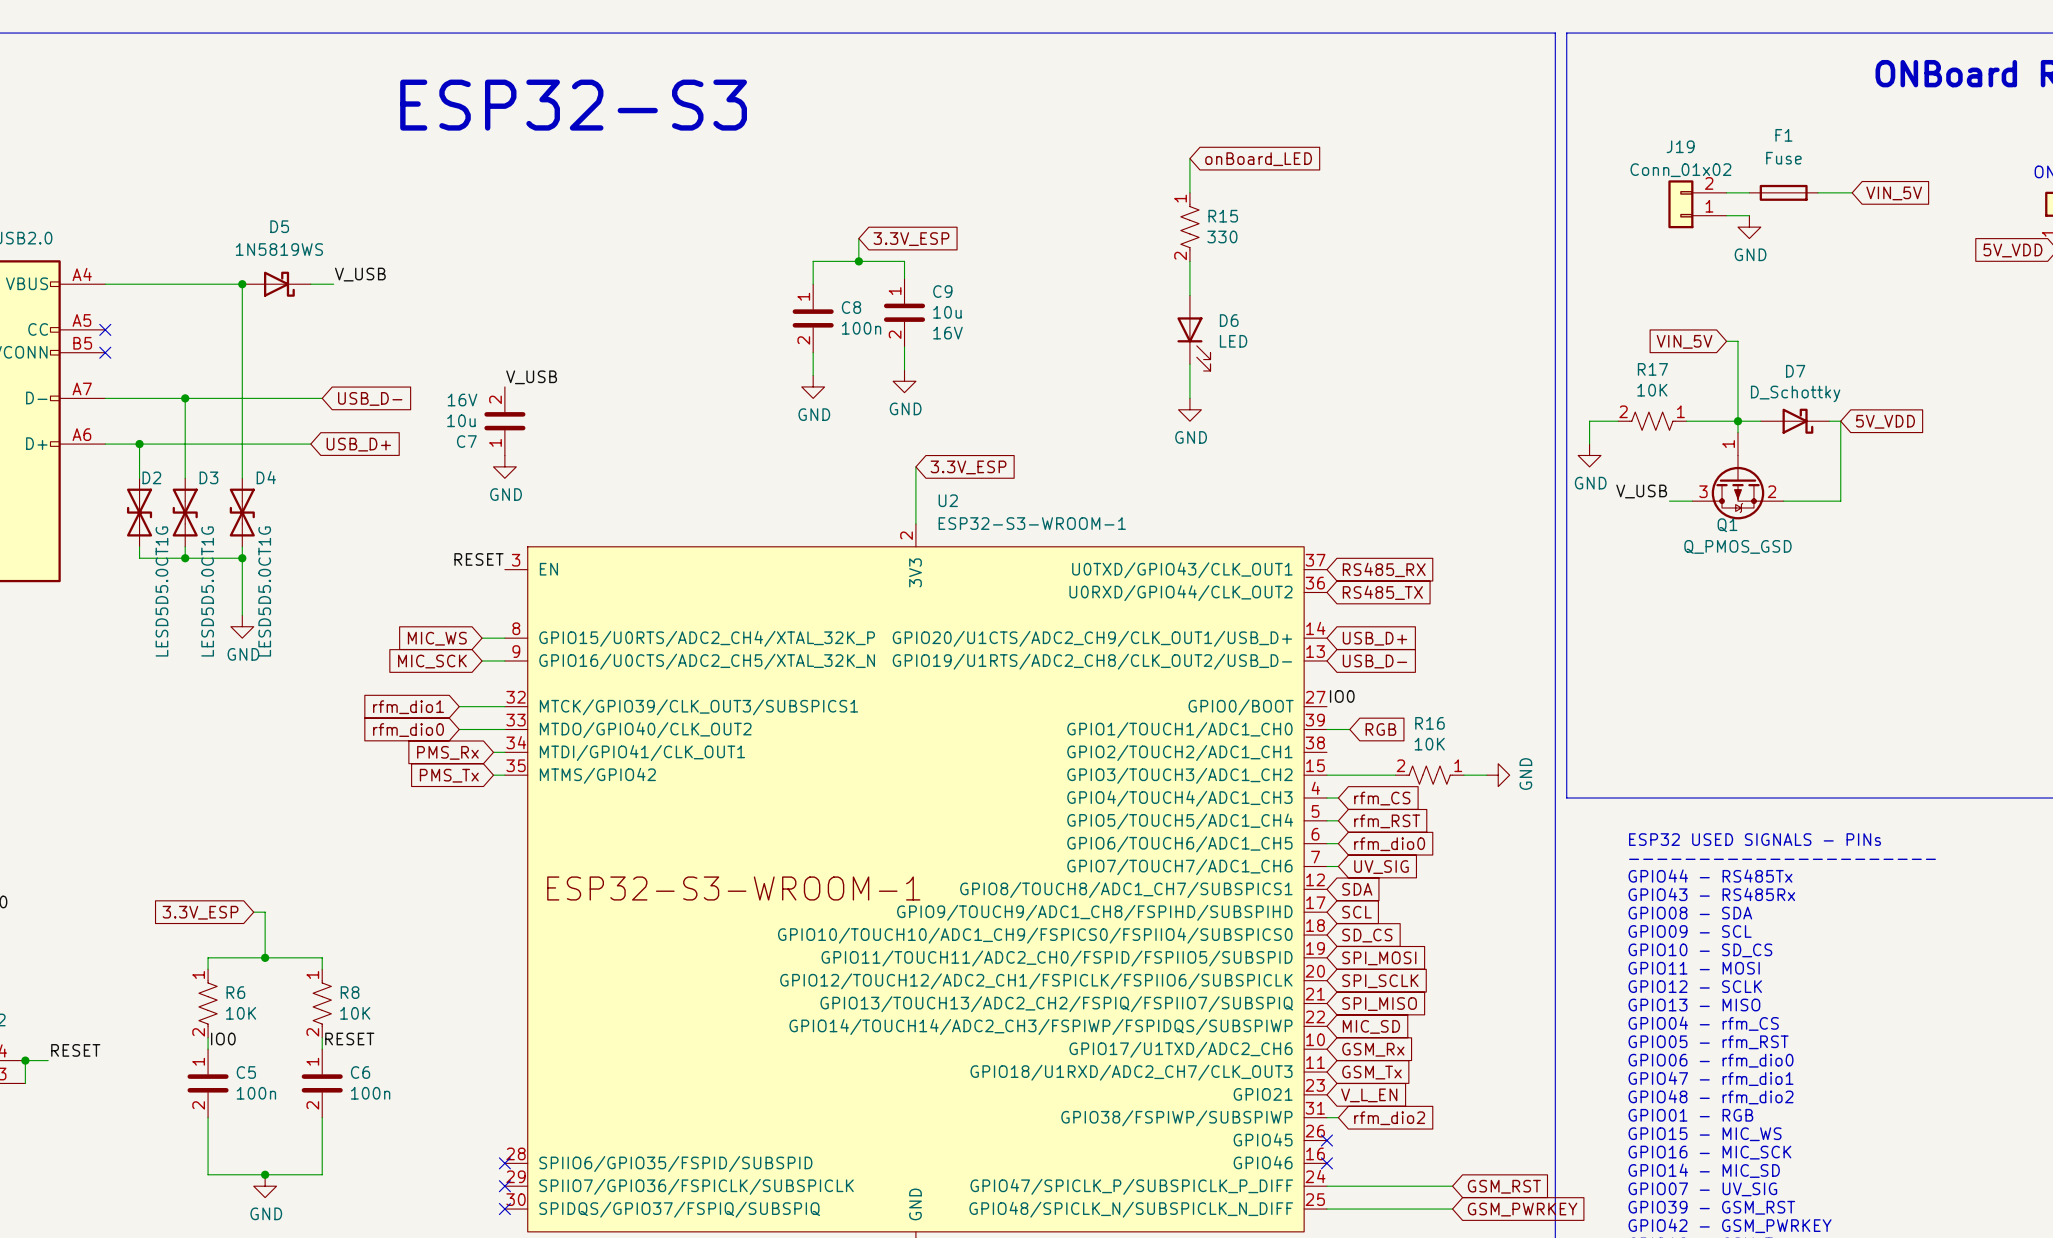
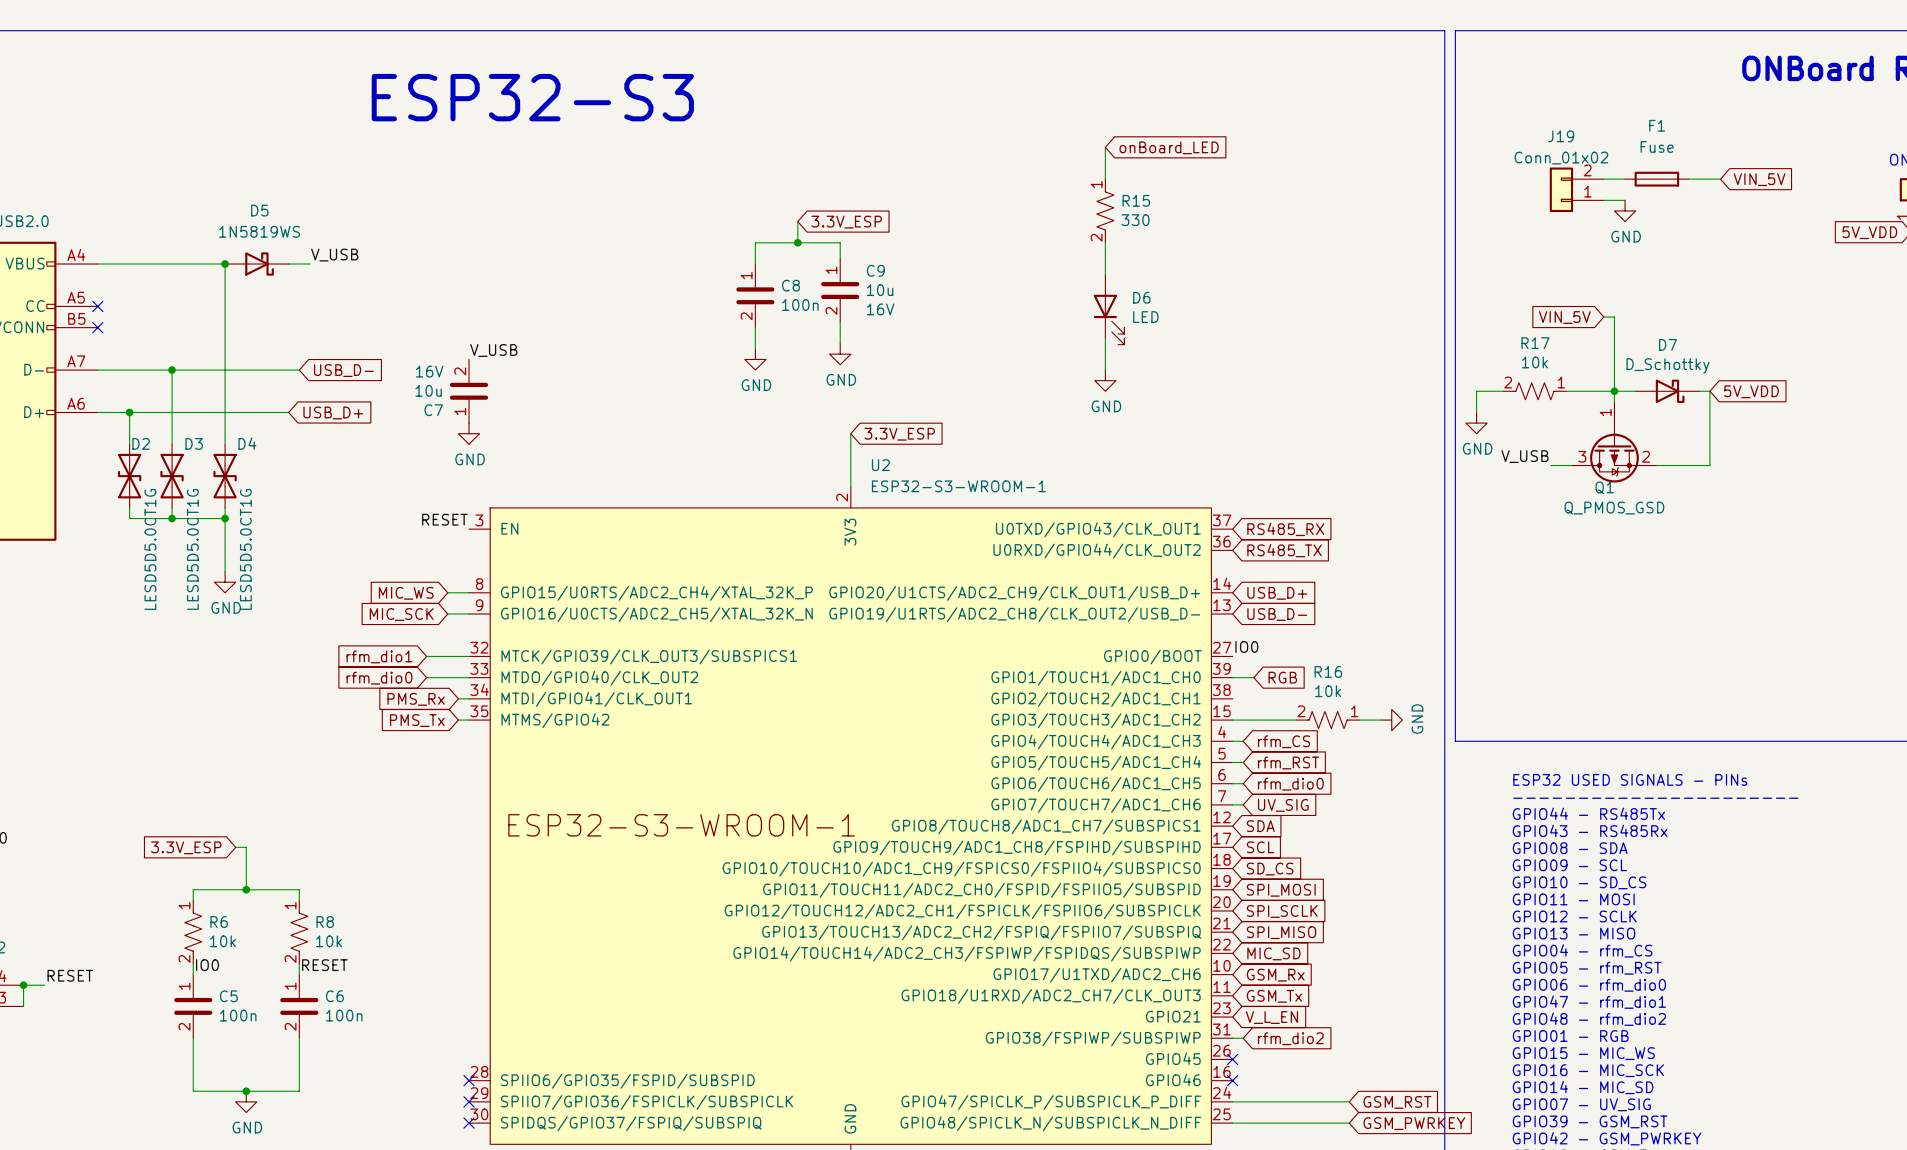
R17 value: 10K (1652, 390) -> 10k (1534, 362)
R16 value: 10K (1429, 744) -> 10k (1328, 691)
R6 value: 10K (241, 1013) -> 10k (222, 941)
R8 value: 10K (355, 1013) -> 10k (328, 941)

